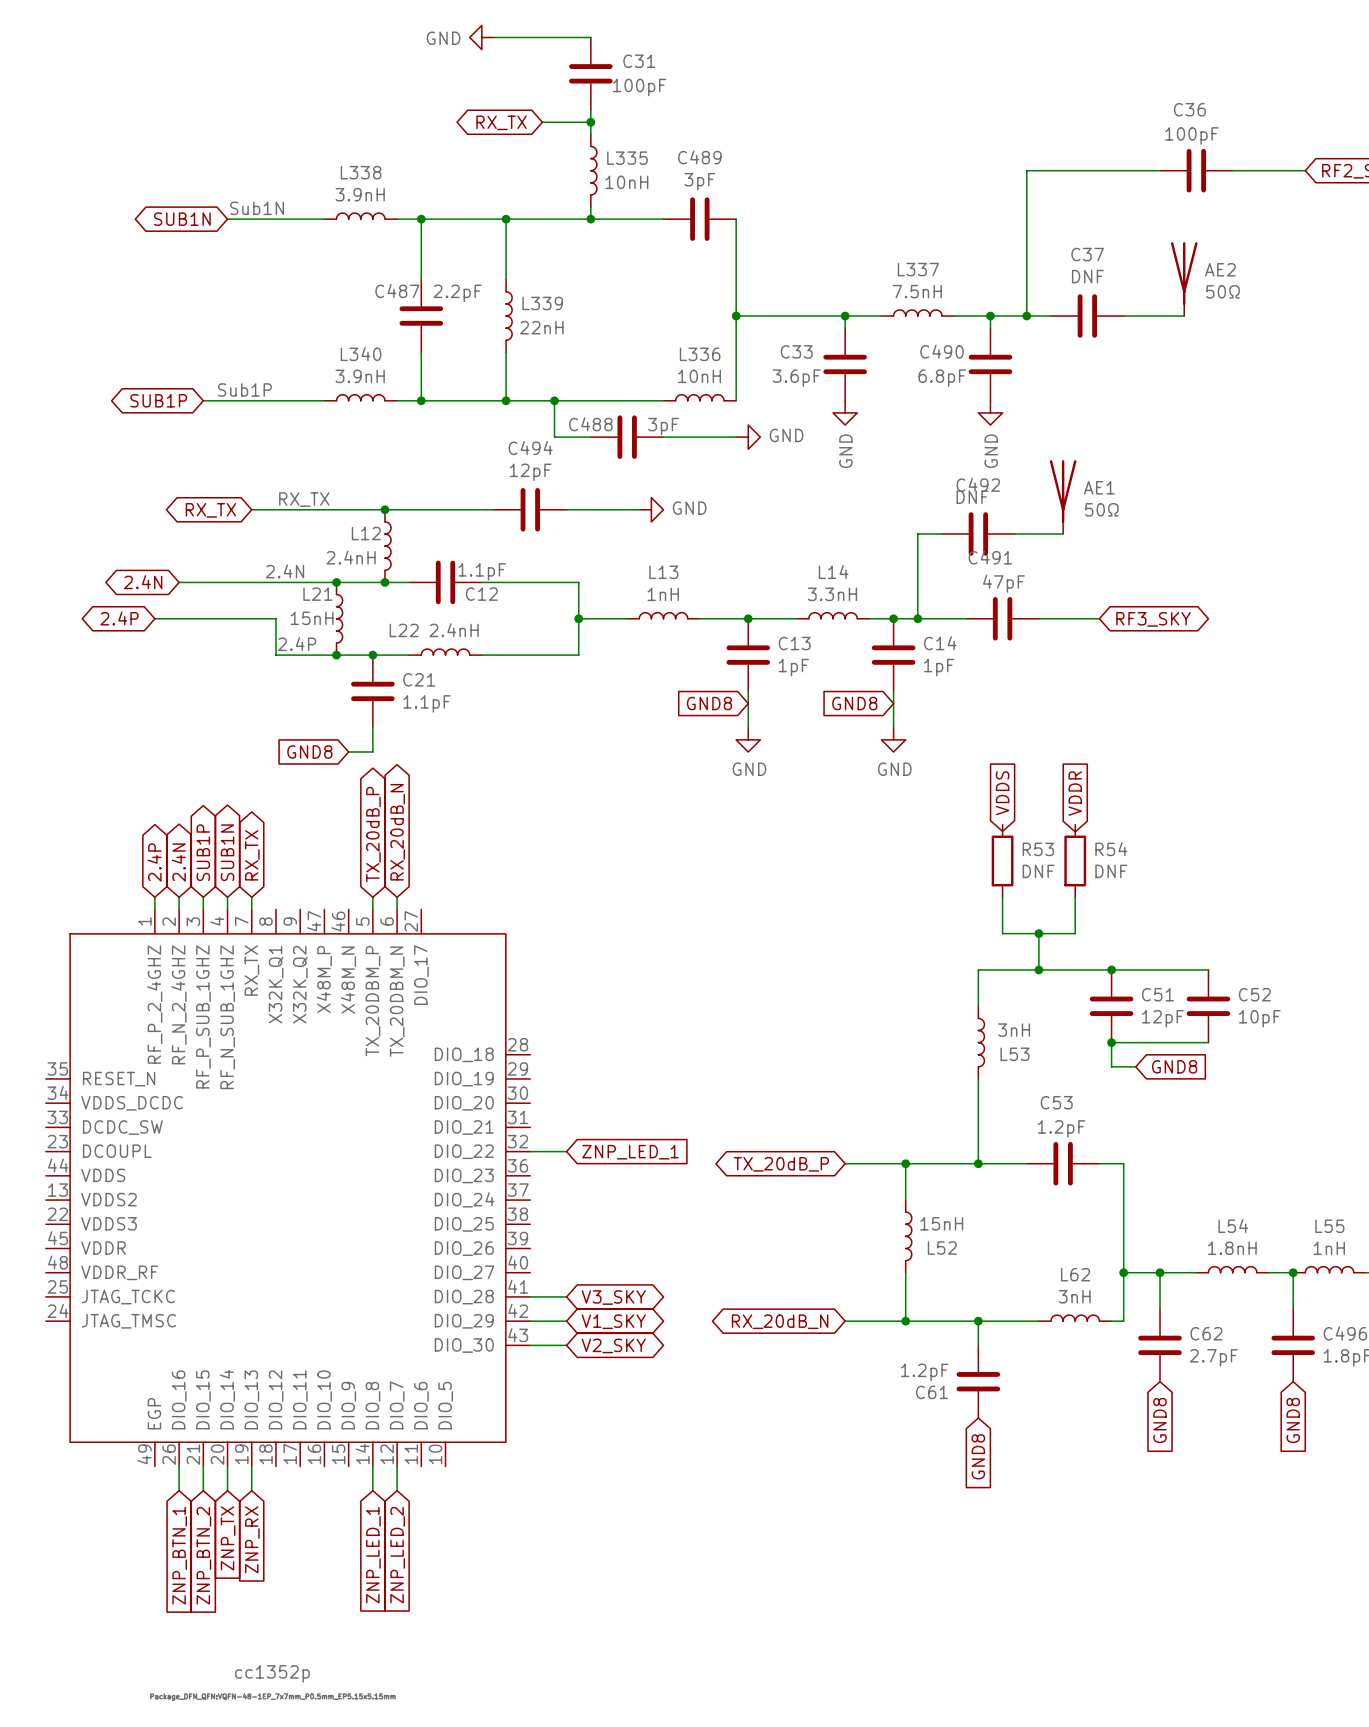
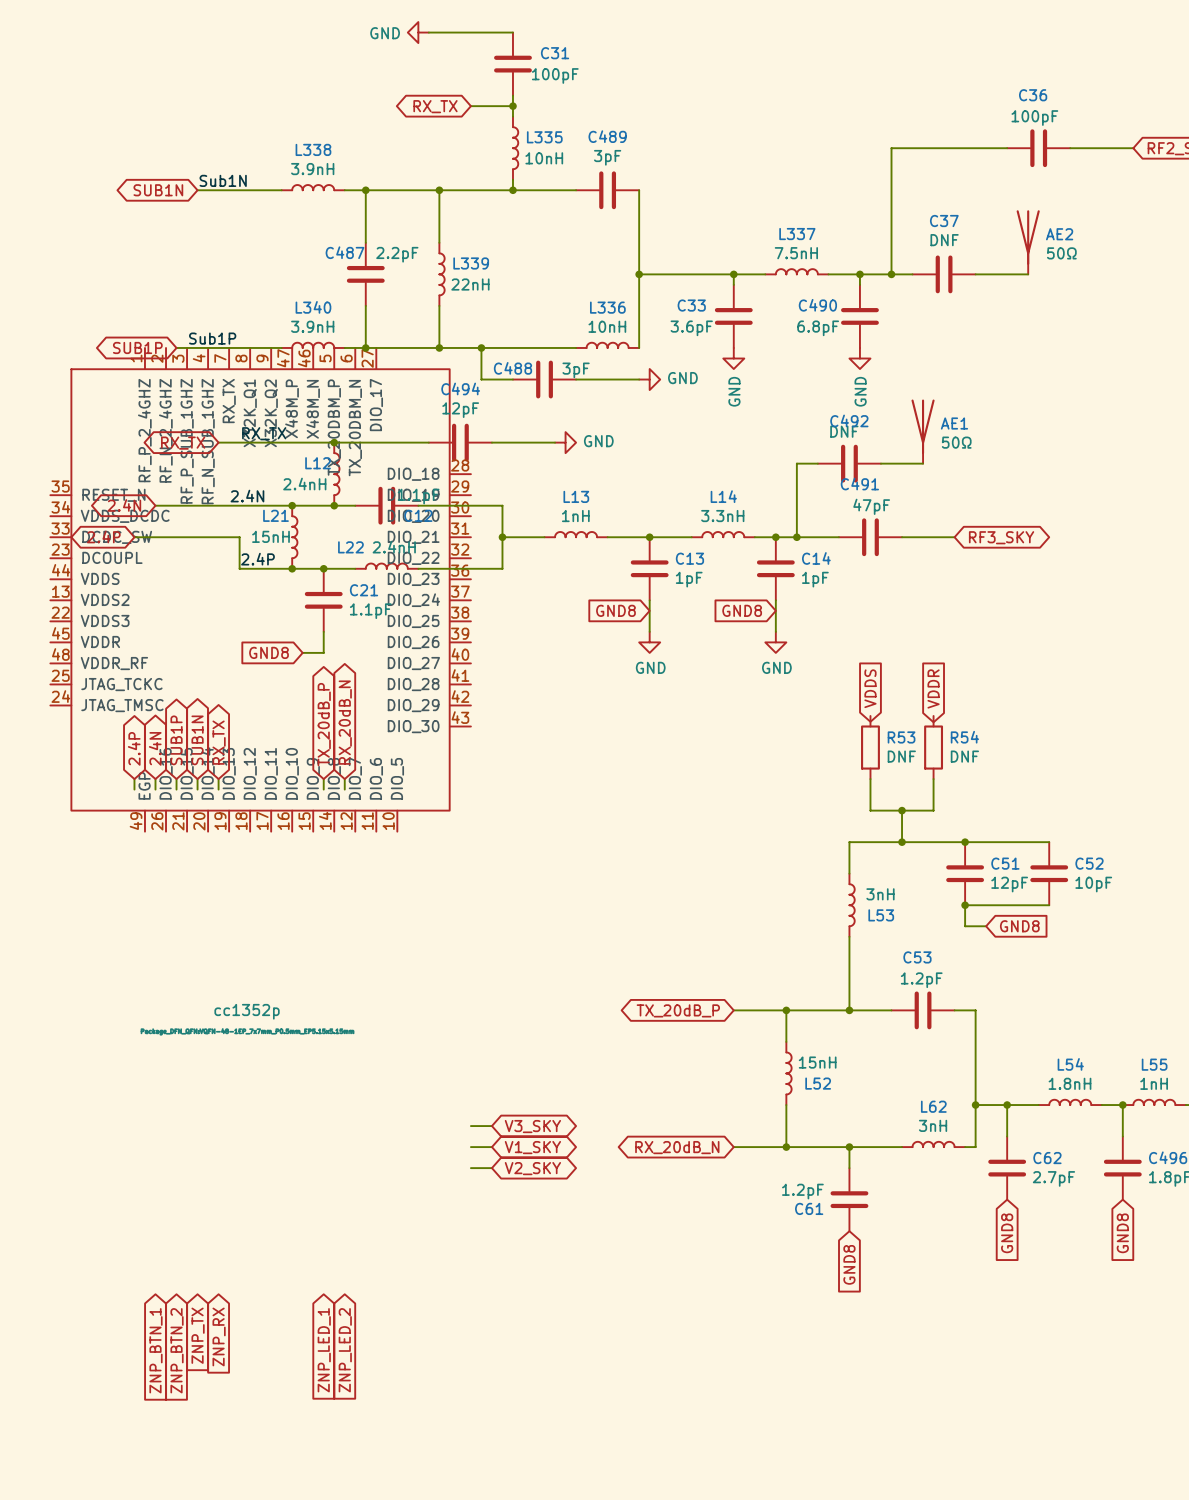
part: none -> cc1352p (260, 589)
wire: (530, 1151) (566, 1151) -> none
global label: ZNP_LED_1 (630, 1152) -> none
part: cc1352p (288, 1187) -> none
wire: (530, 1296) (542, 1296) -> none
wire: (530, 1321) (542, 1321) -> none
wire: (530, 1345) (542, 1345) -> none
wire: (179, 1466) (179, 1490) -> none
wire: (203, 1466) (203, 1490) -> none
wire: (227, 1466) (227, 1490) -> none
wire: (251, 1466) (251, 1490) -> none
wire: (372, 1466) (372, 1490) -> none
wire: (397, 1466) (397, 1490) -> none

